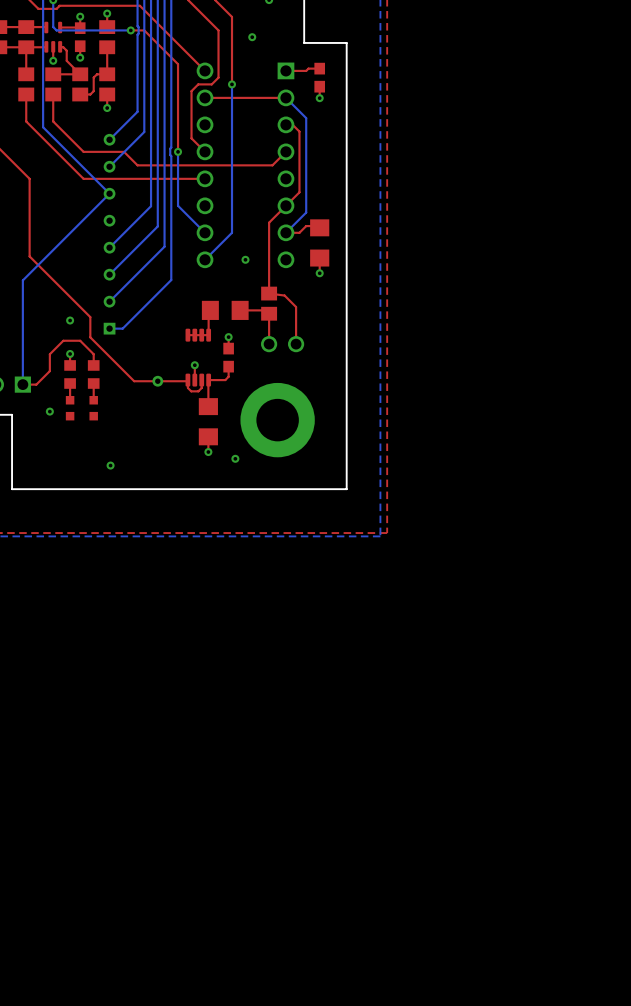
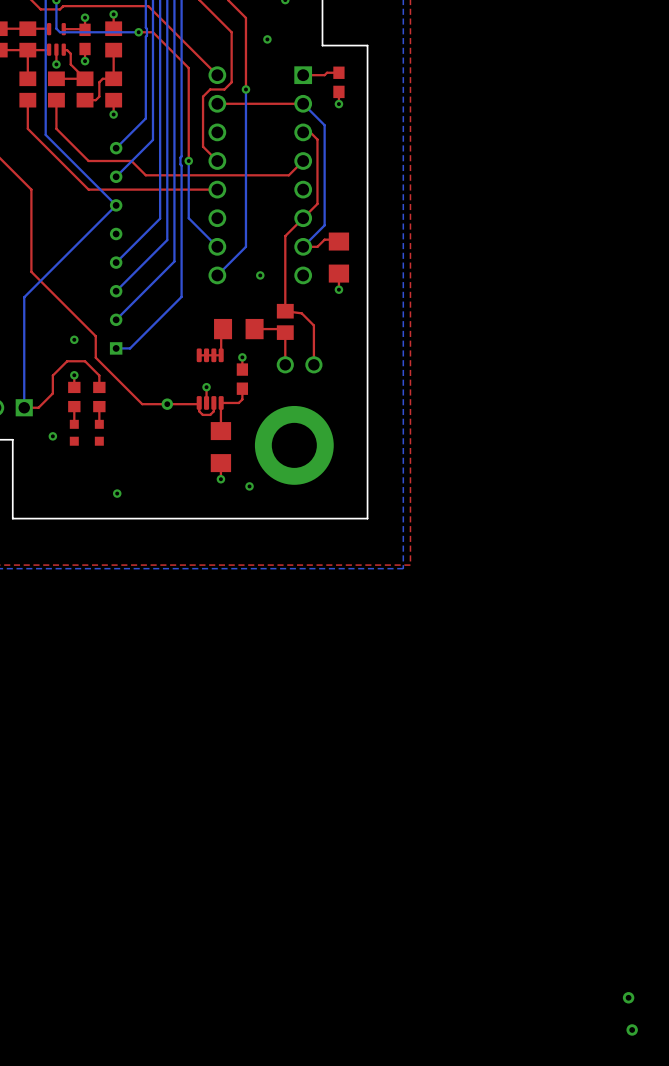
part: none -> (628, 997)
part: none -> (632, 1029)

